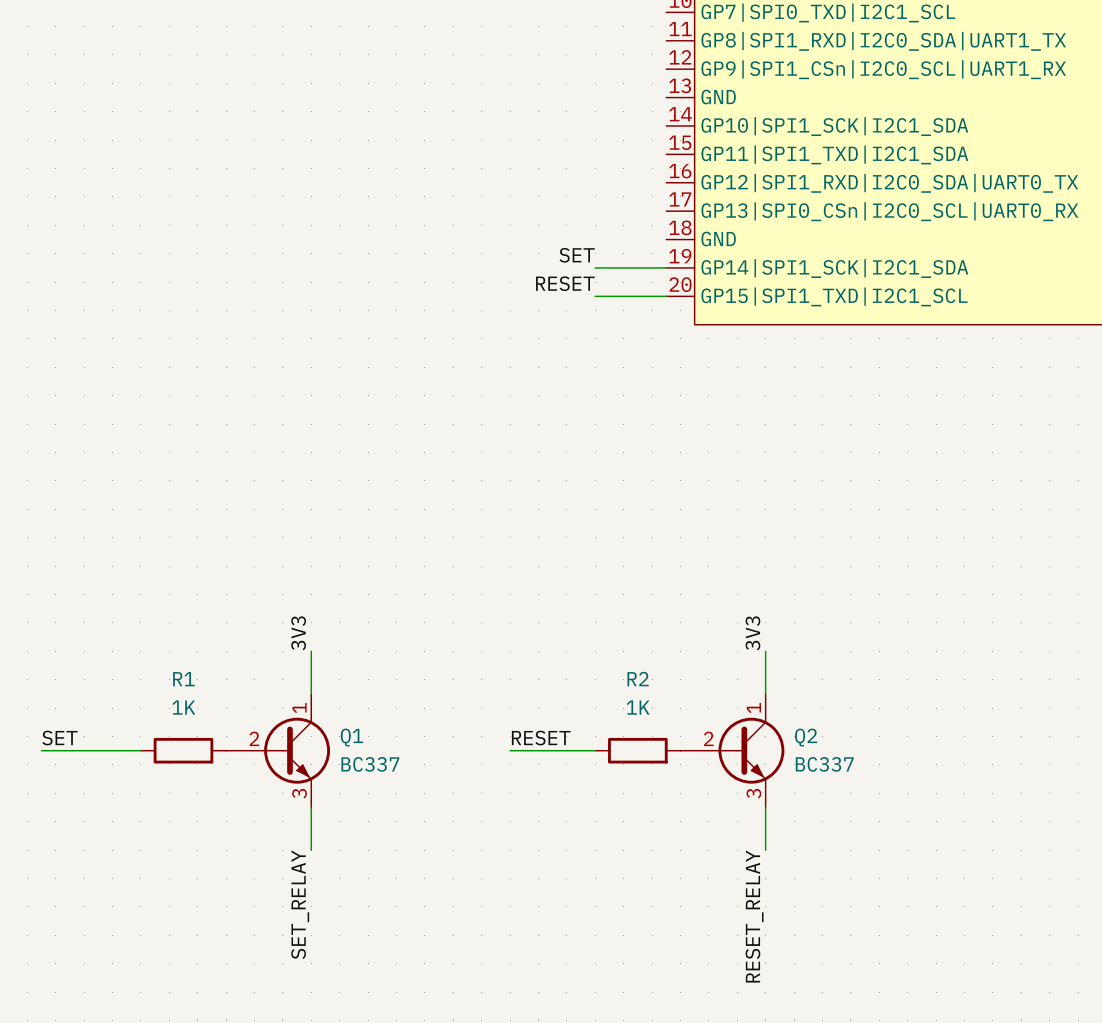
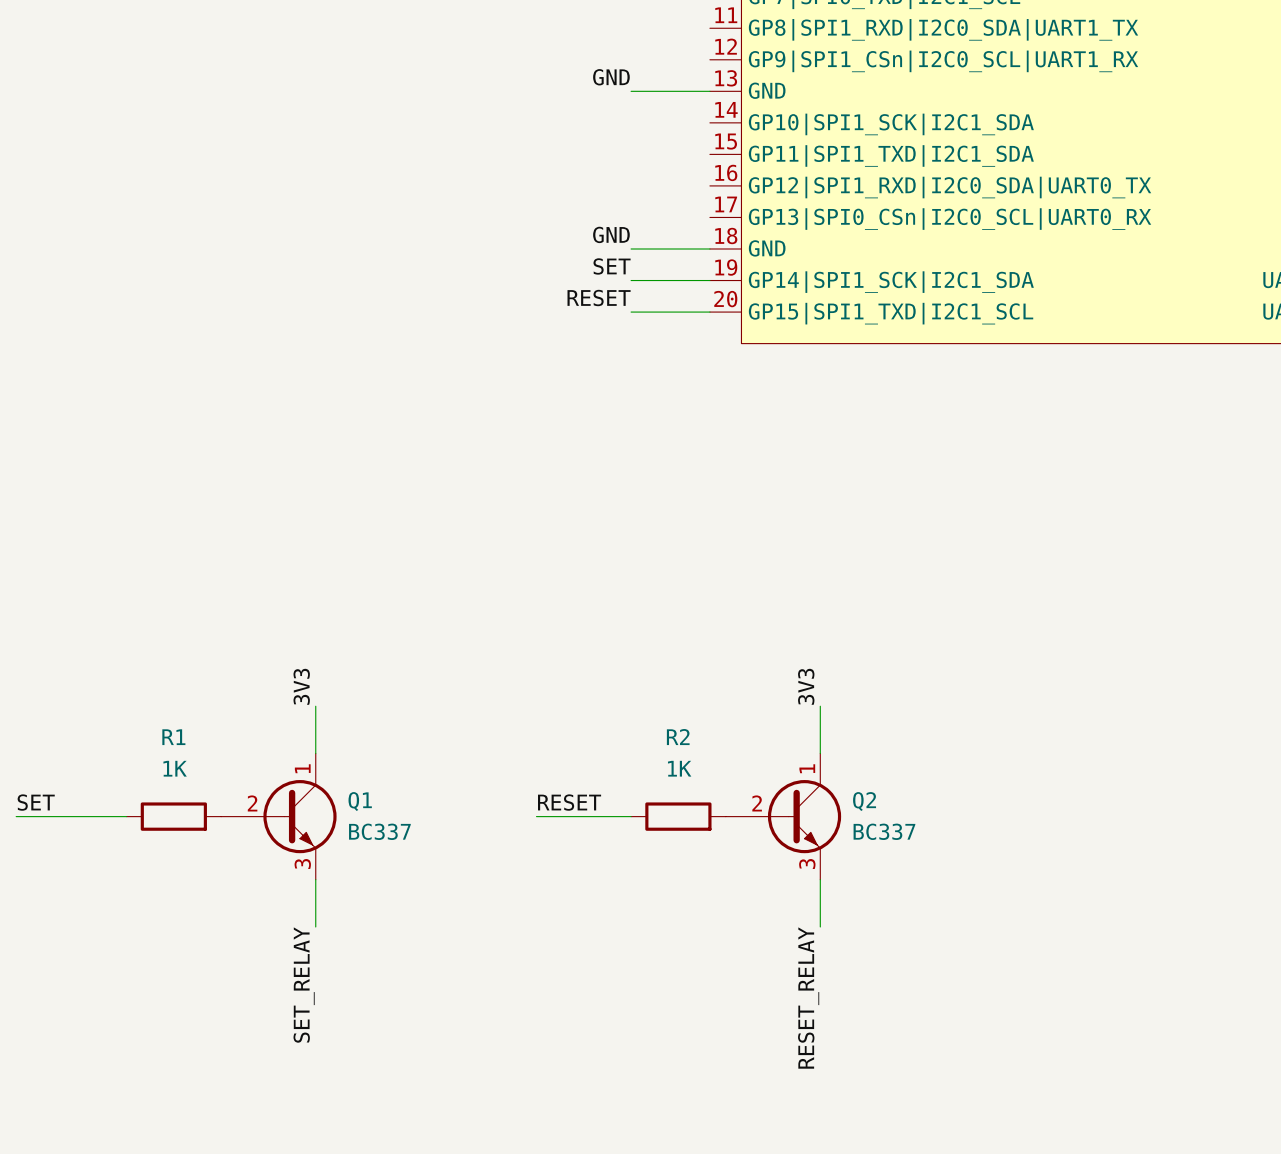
label: none -> GND (611, 77)
wire: none -> (631, 91) (709, 91)
label: none -> GND (611, 234)
wire: none -> (631, 248) (709, 248)

